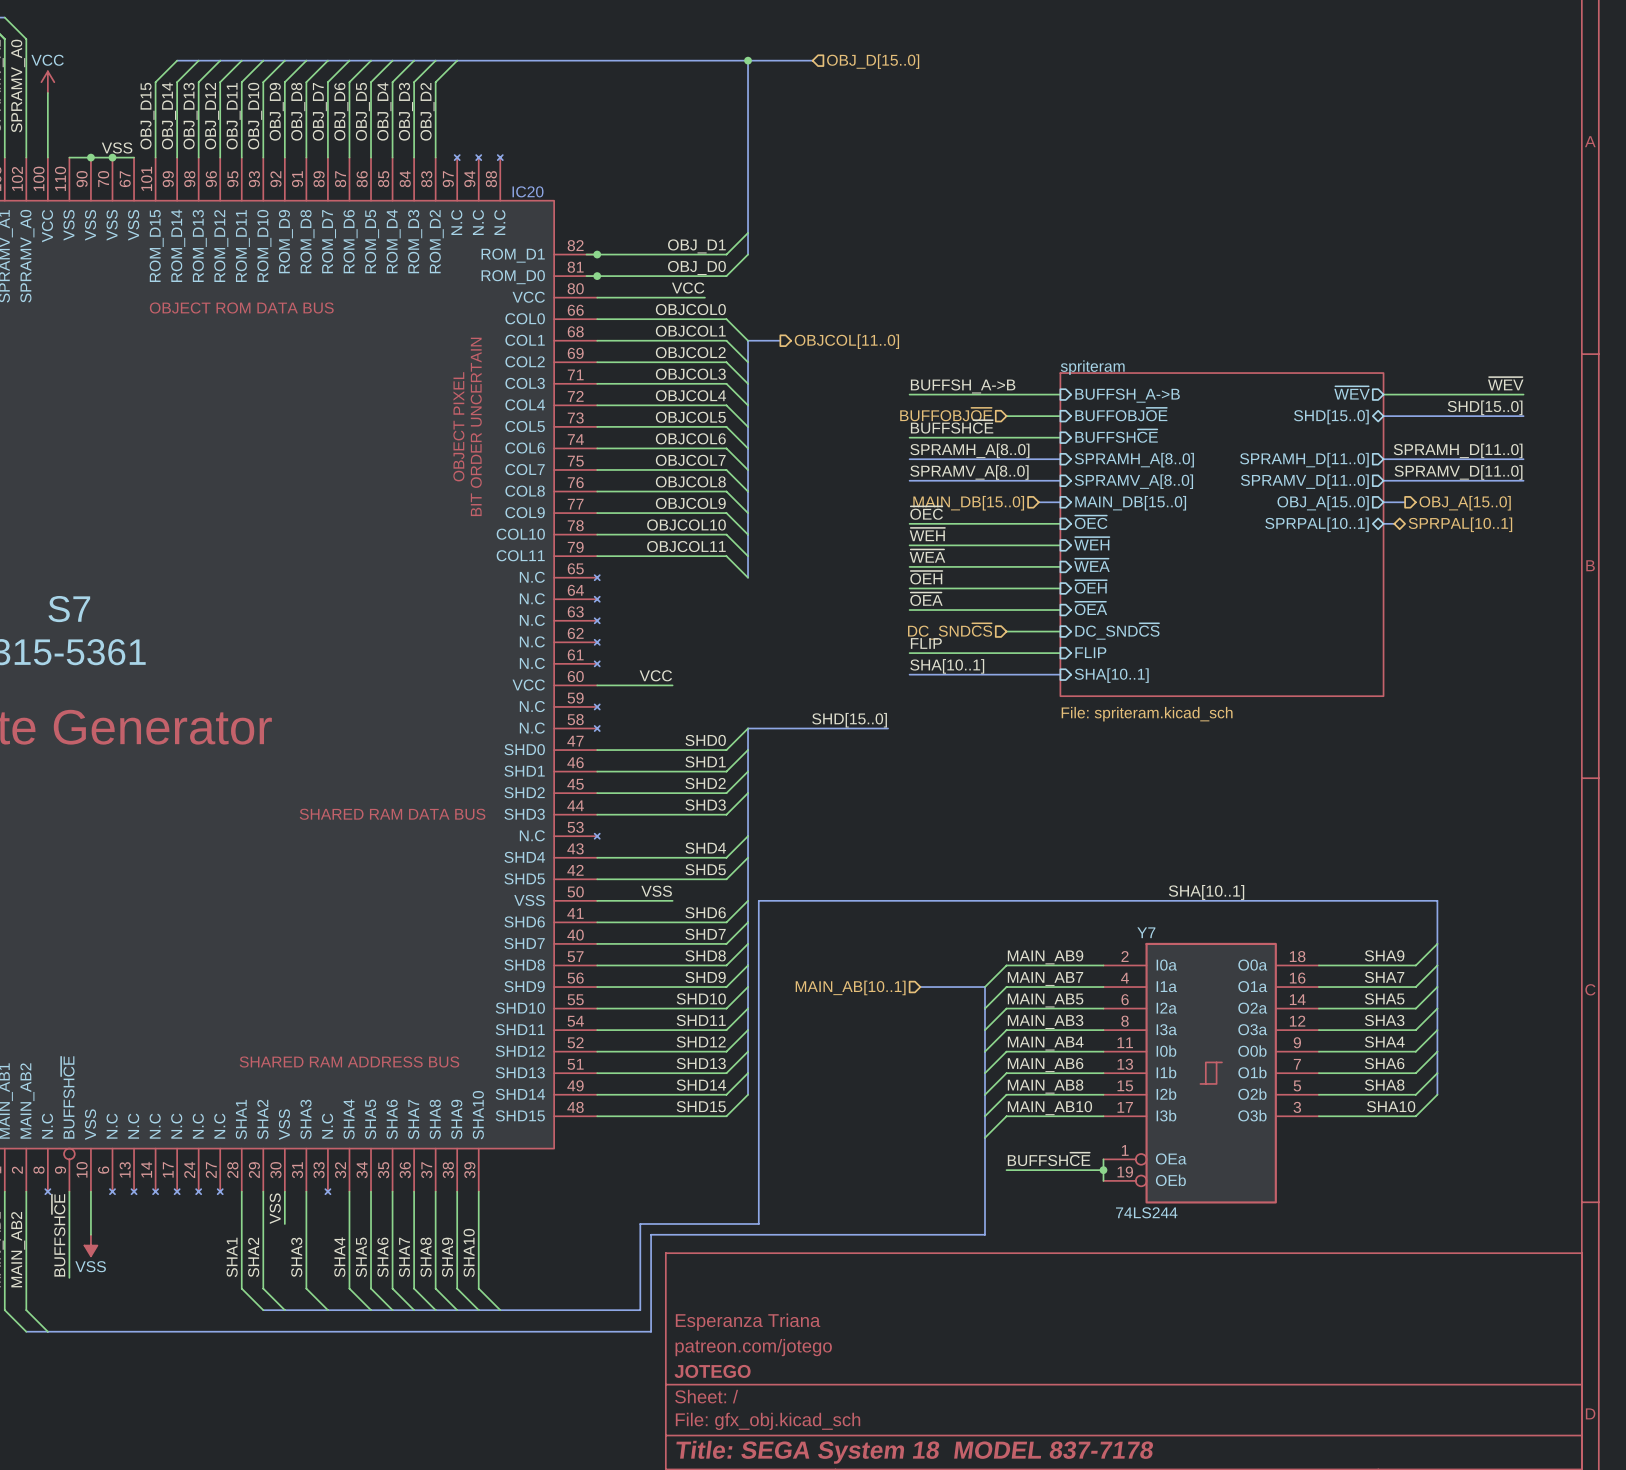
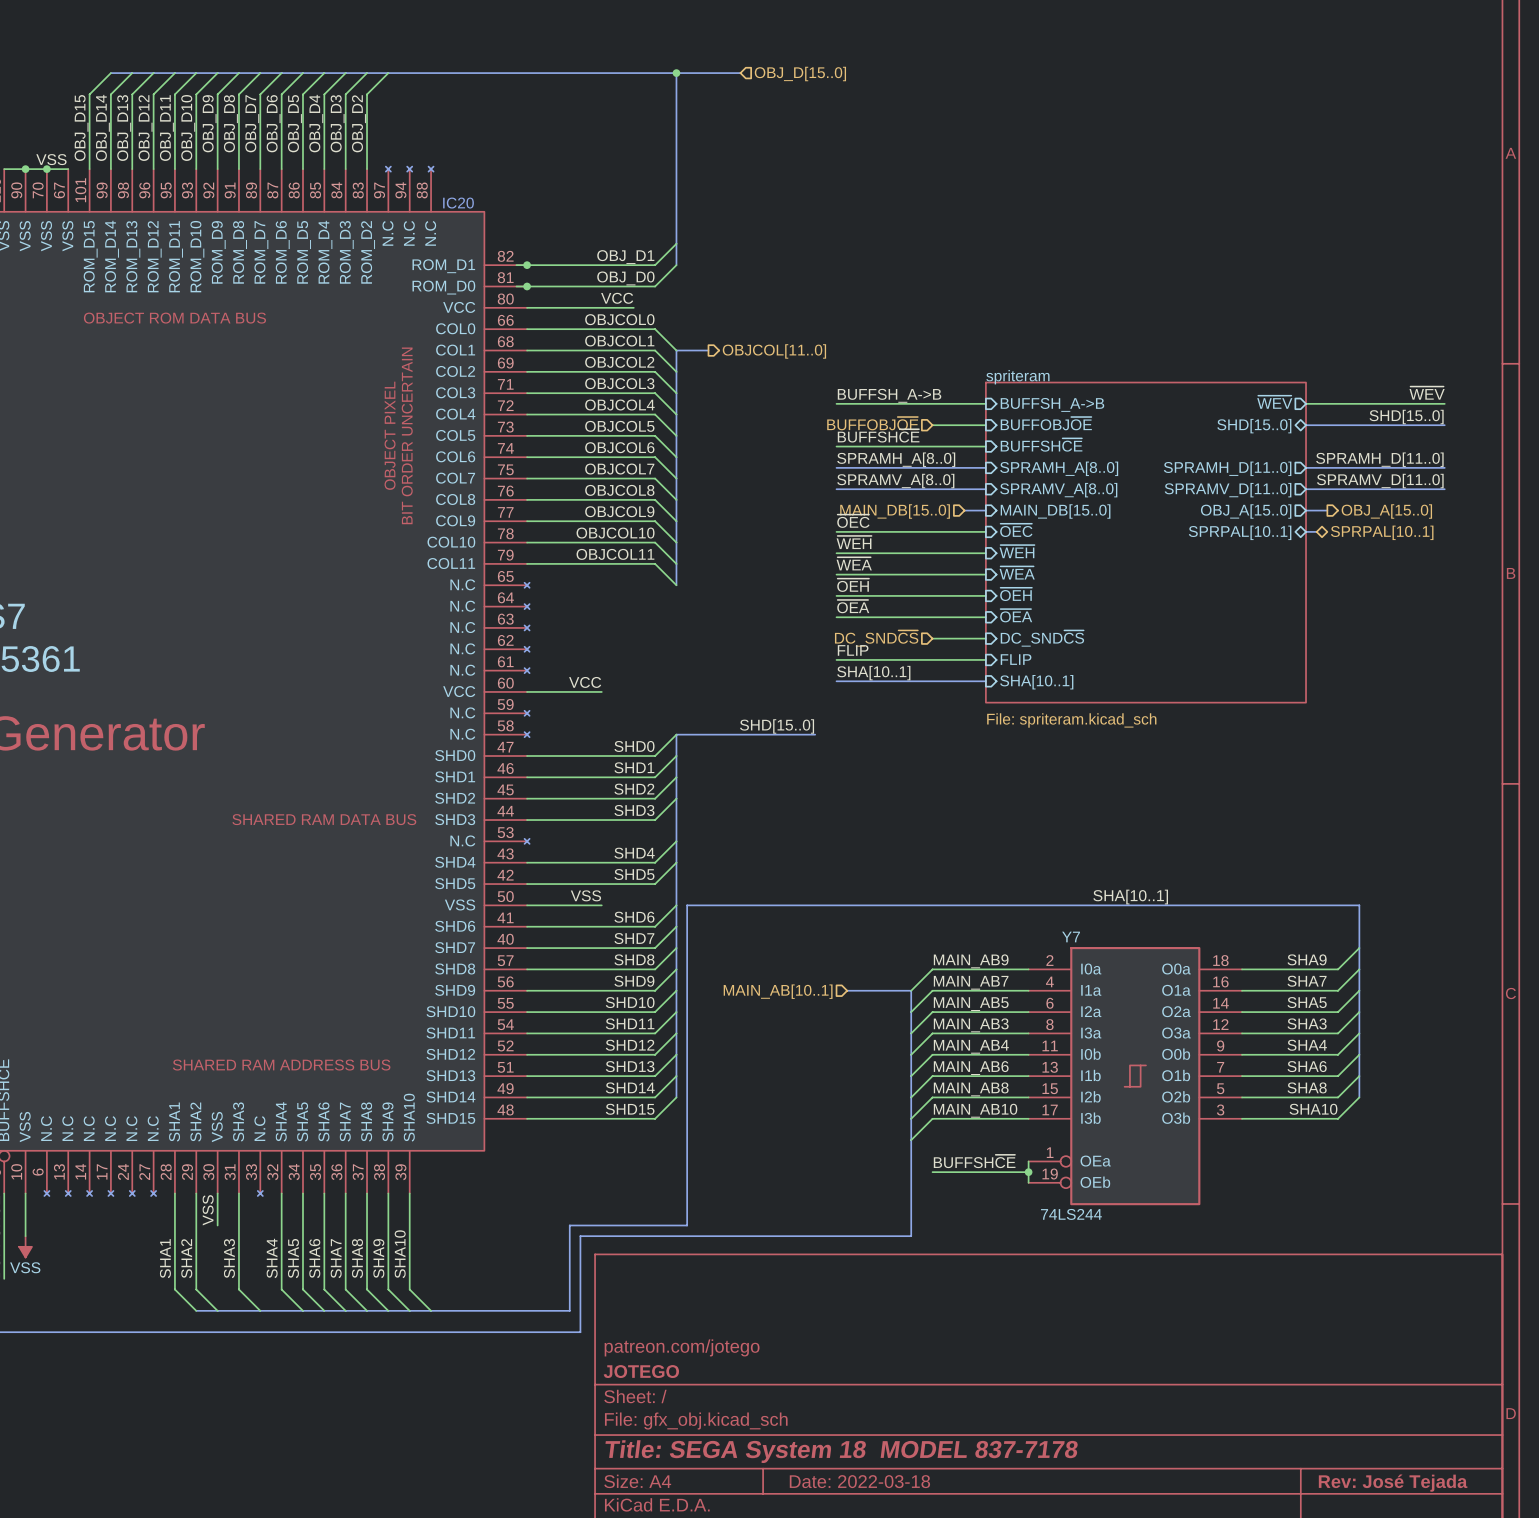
title block: Esperanza Triana (748, 1322) -> none

